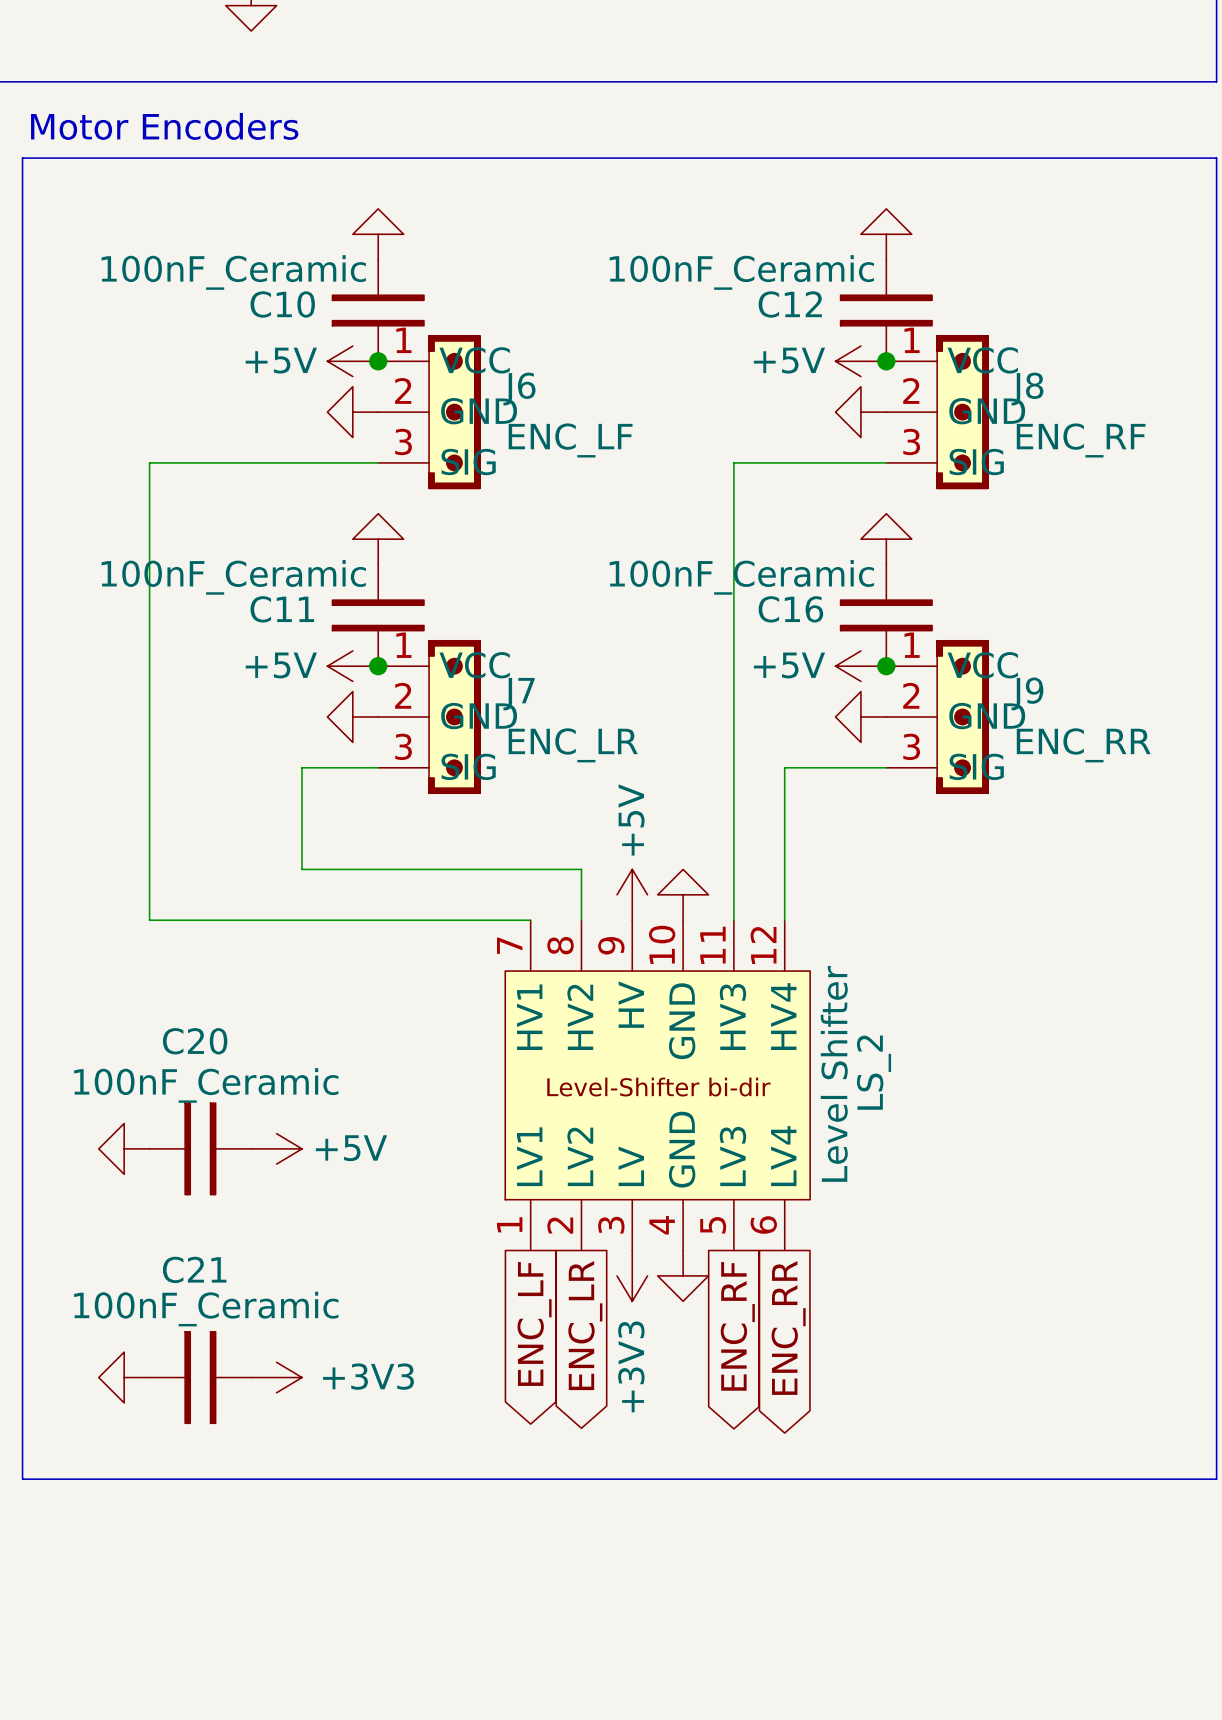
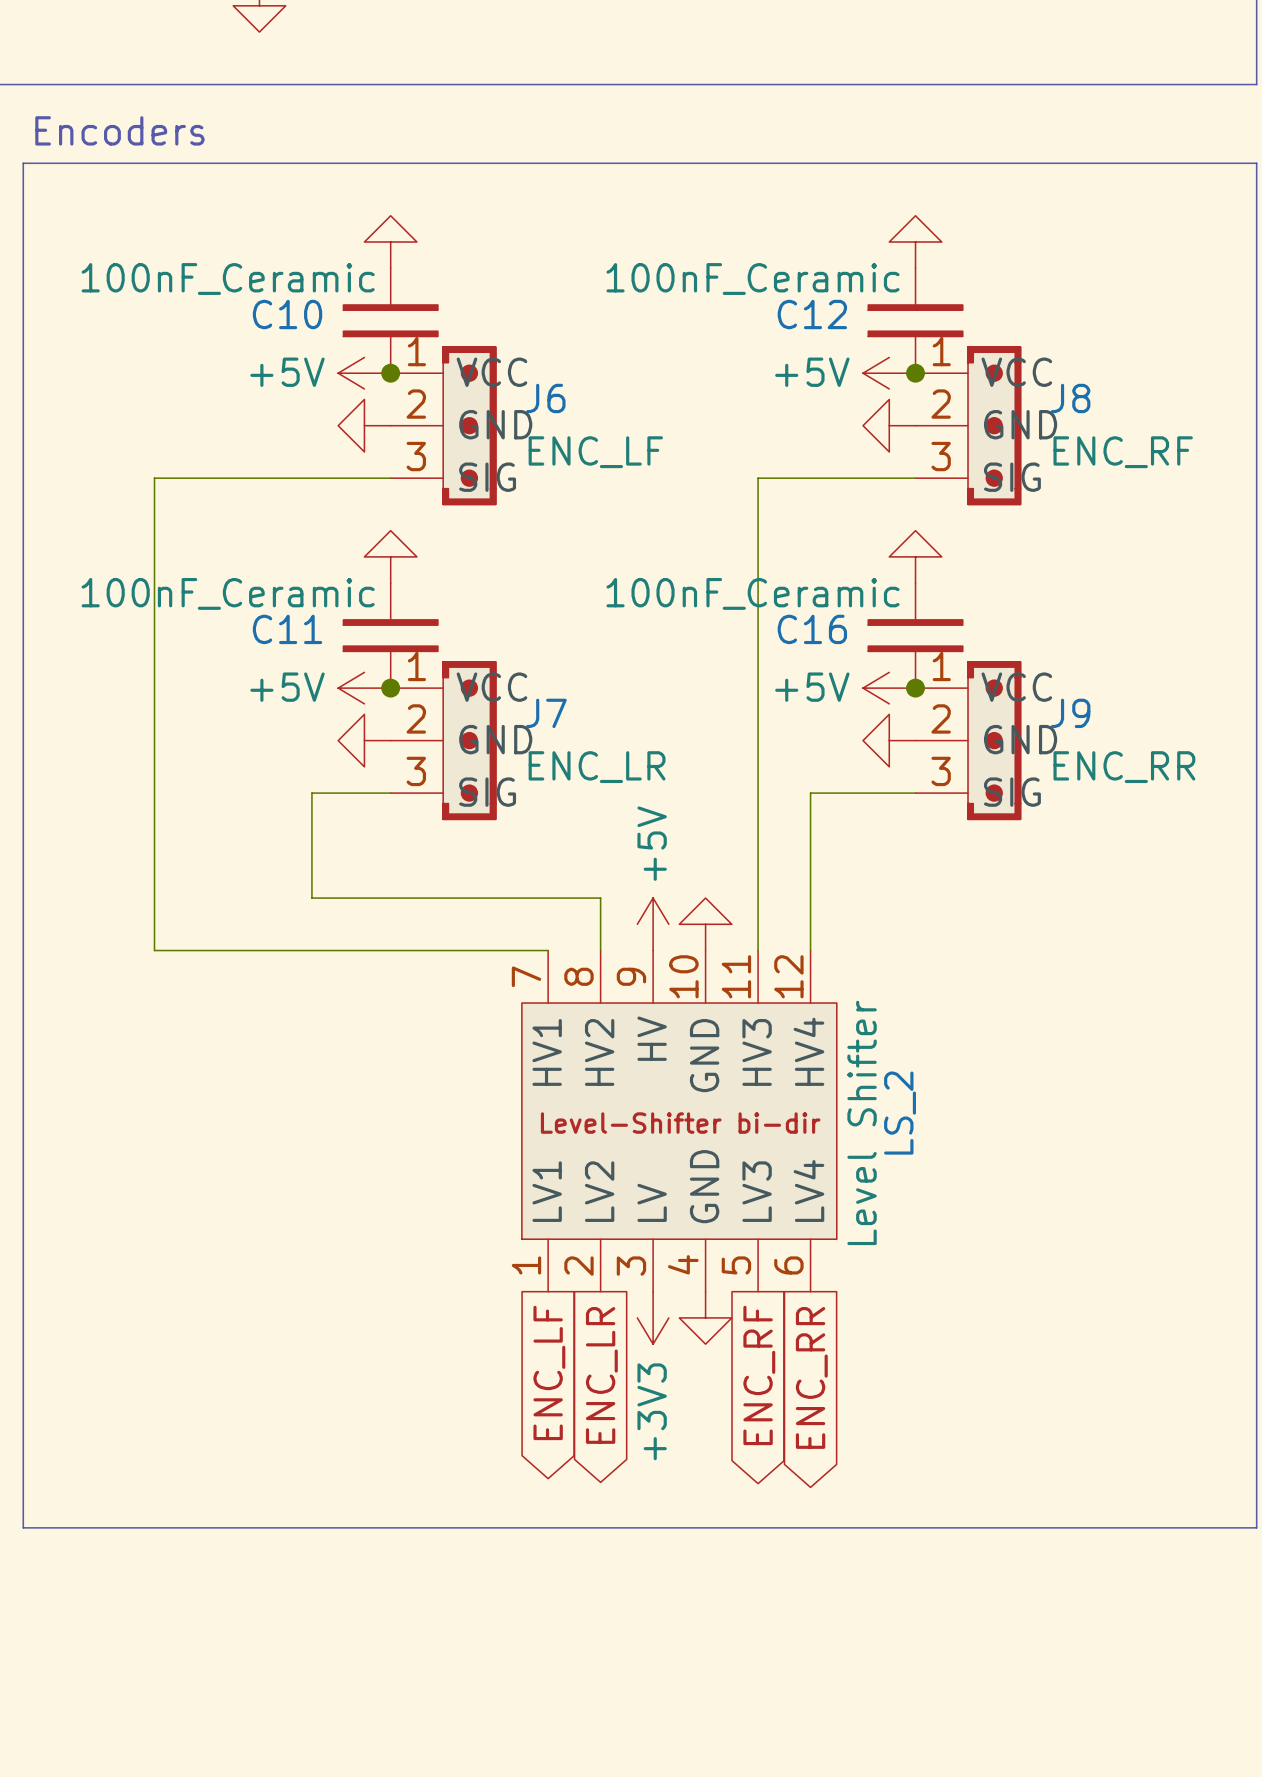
text: Motor Encoders (164, 126) -> Encoders (119, 130)
power symbol: (124, 1148) -> none
C20: 100nF_Ceramic (200, 1148) -> none
power symbol: +5V (276, 1148) -> none
power symbol: (124, 1377) -> none
C21: 100nF_Ceramic (200, 1377) -> none
power symbol: +3V3 (276, 1377) -> none

